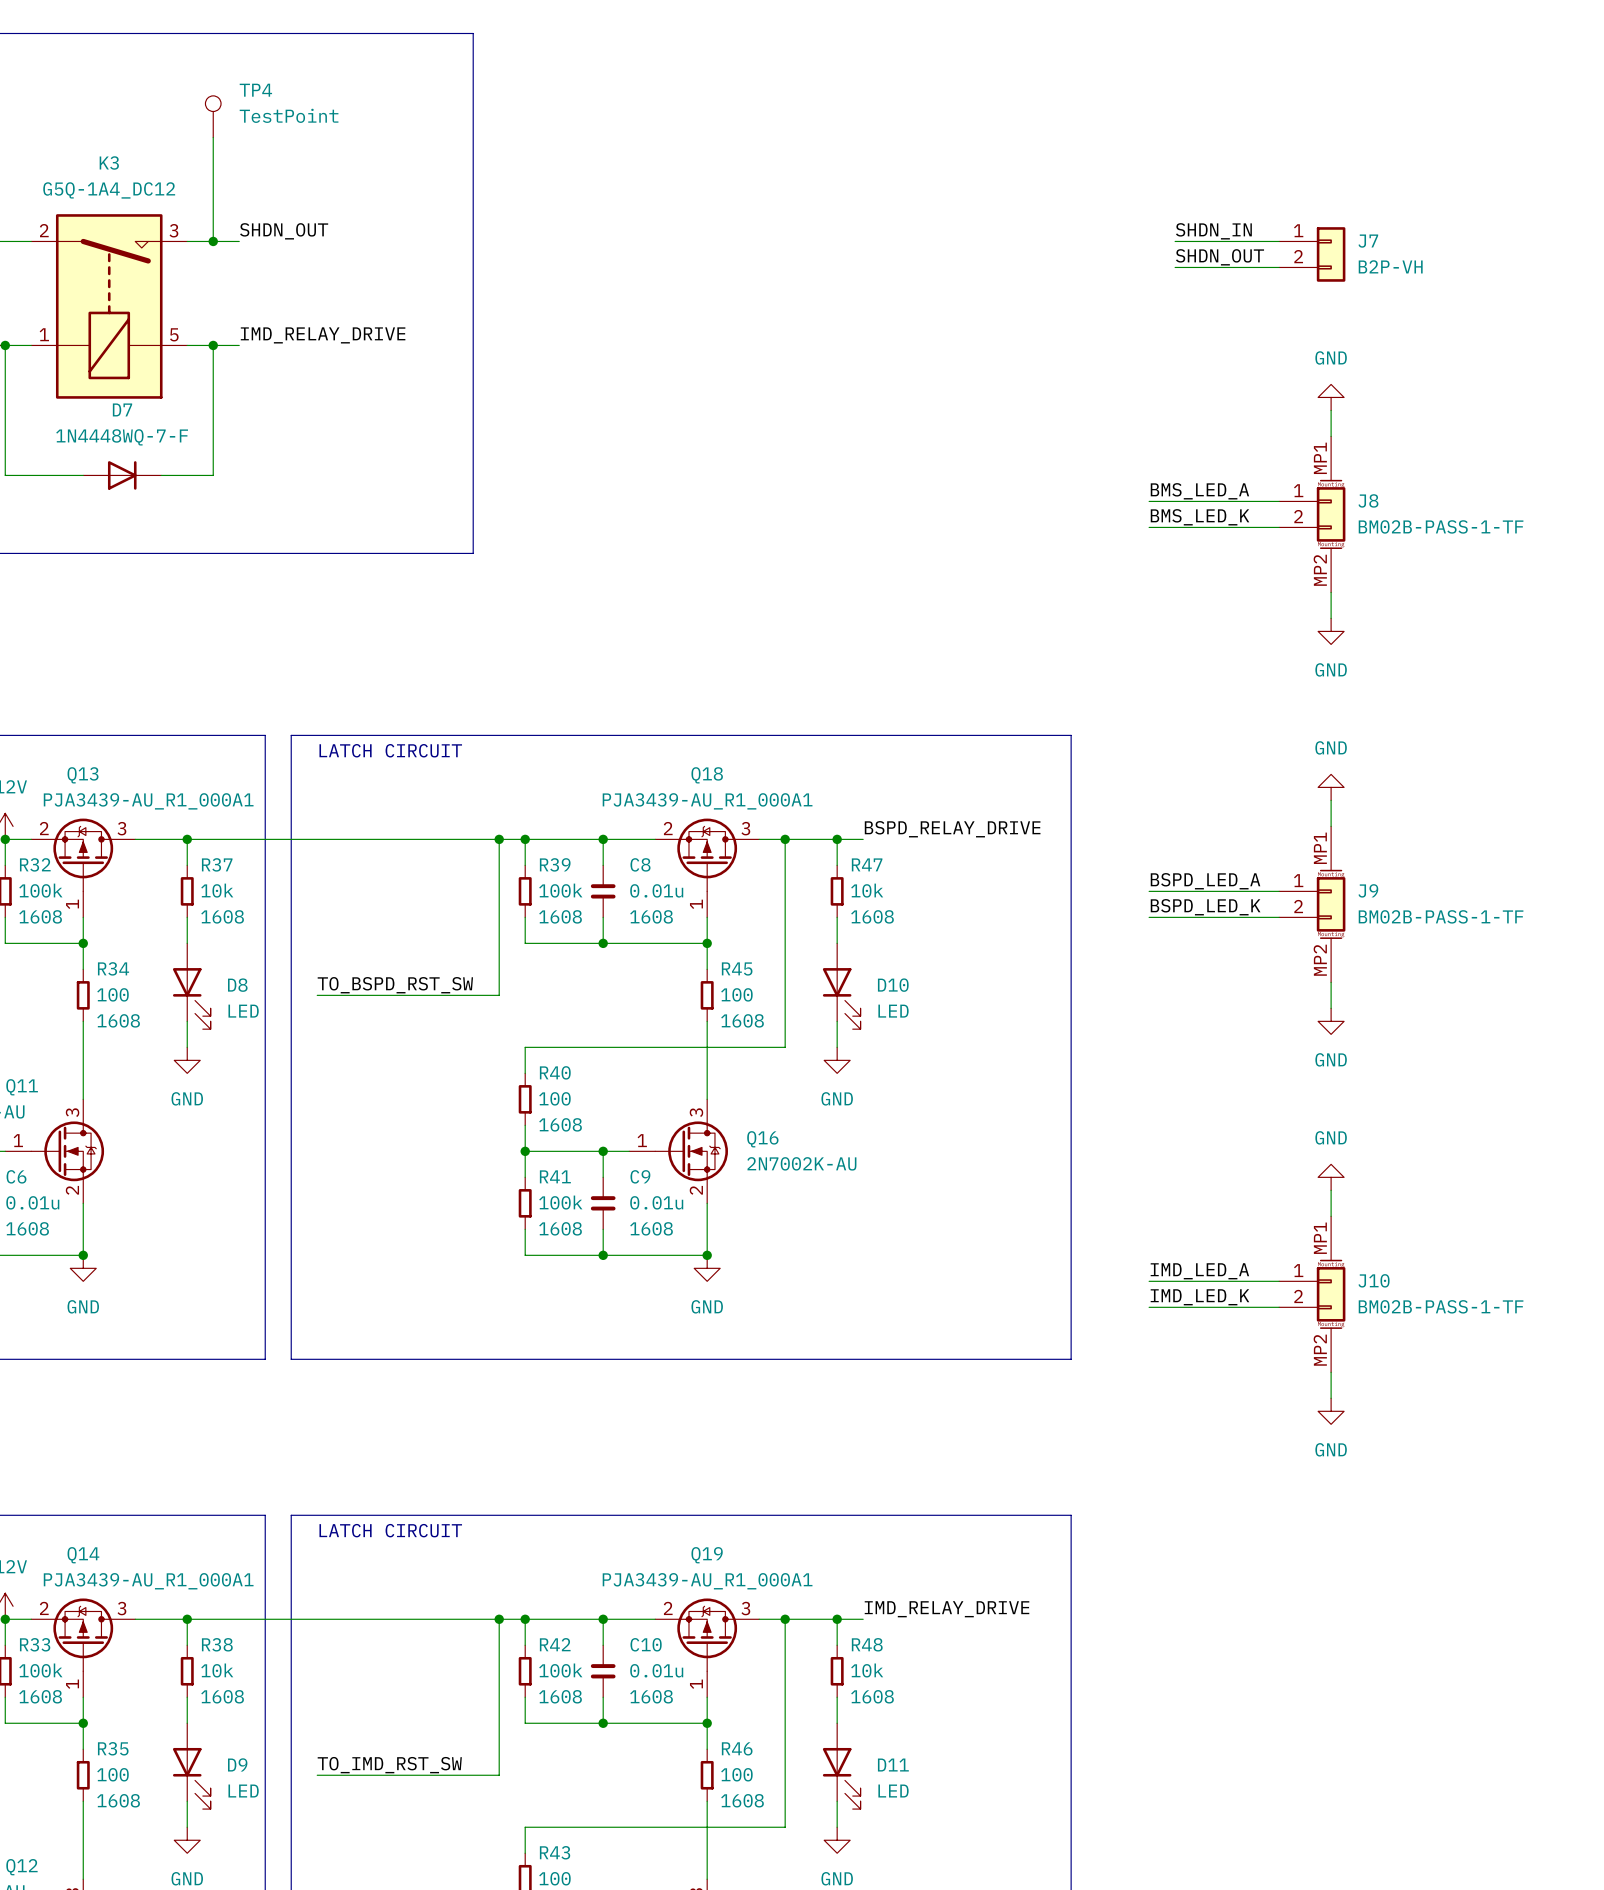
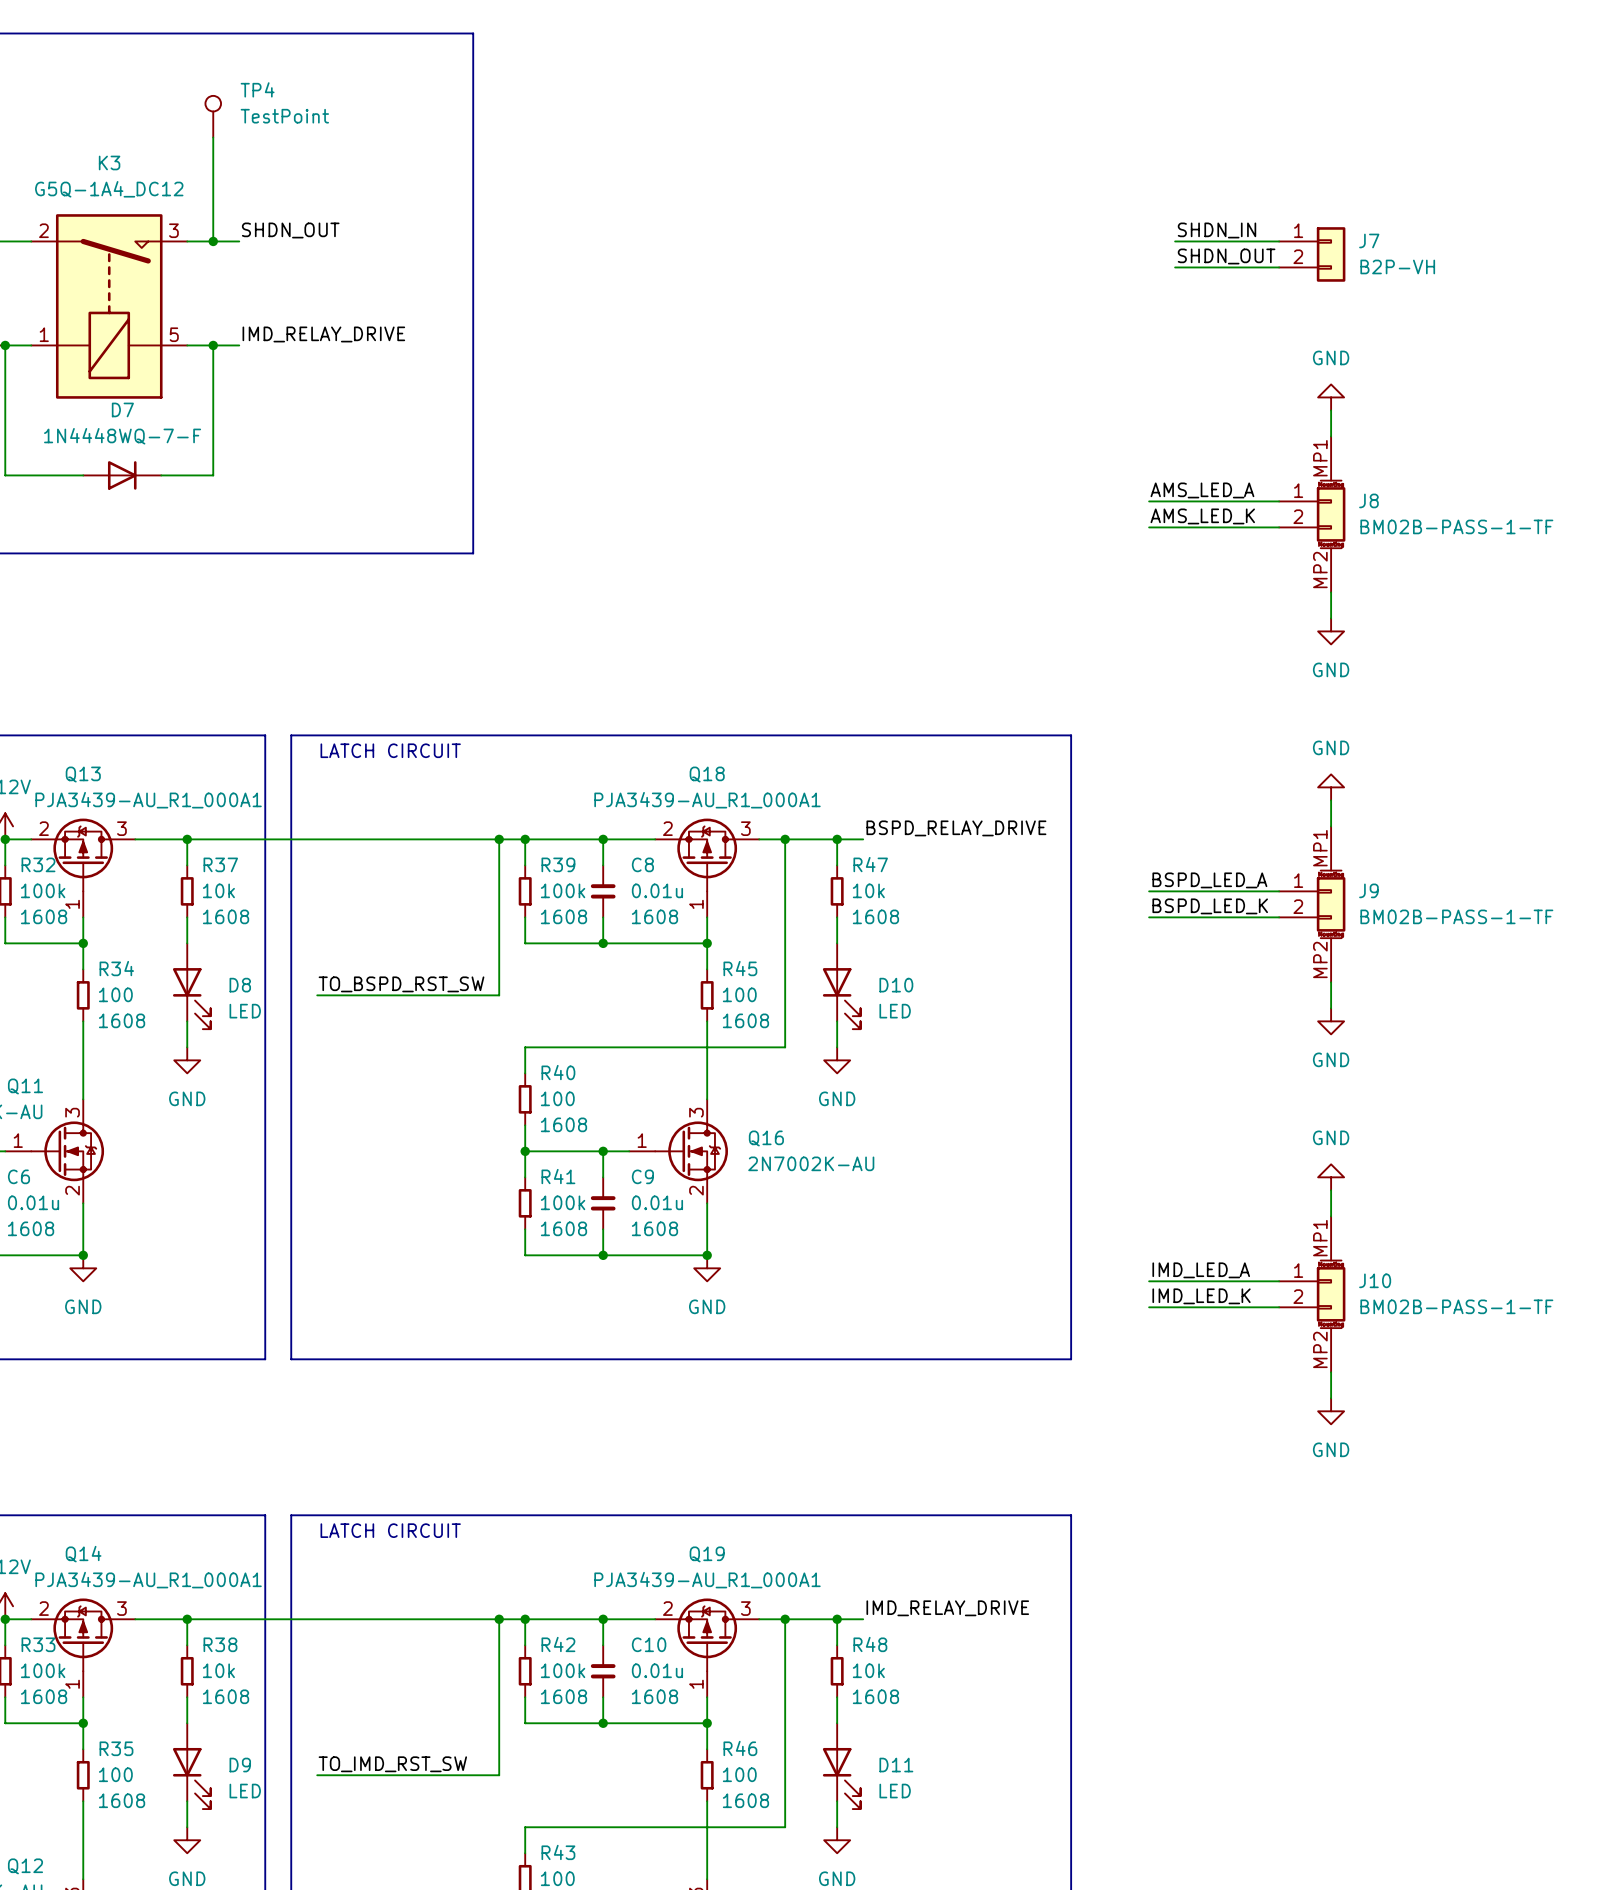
label: BMS_LED_A (1199, 491) -> AMS_LED_A (1202, 490)
label: BMS_LED_K (1200, 517) -> AMS_LED_K (1202, 516)

